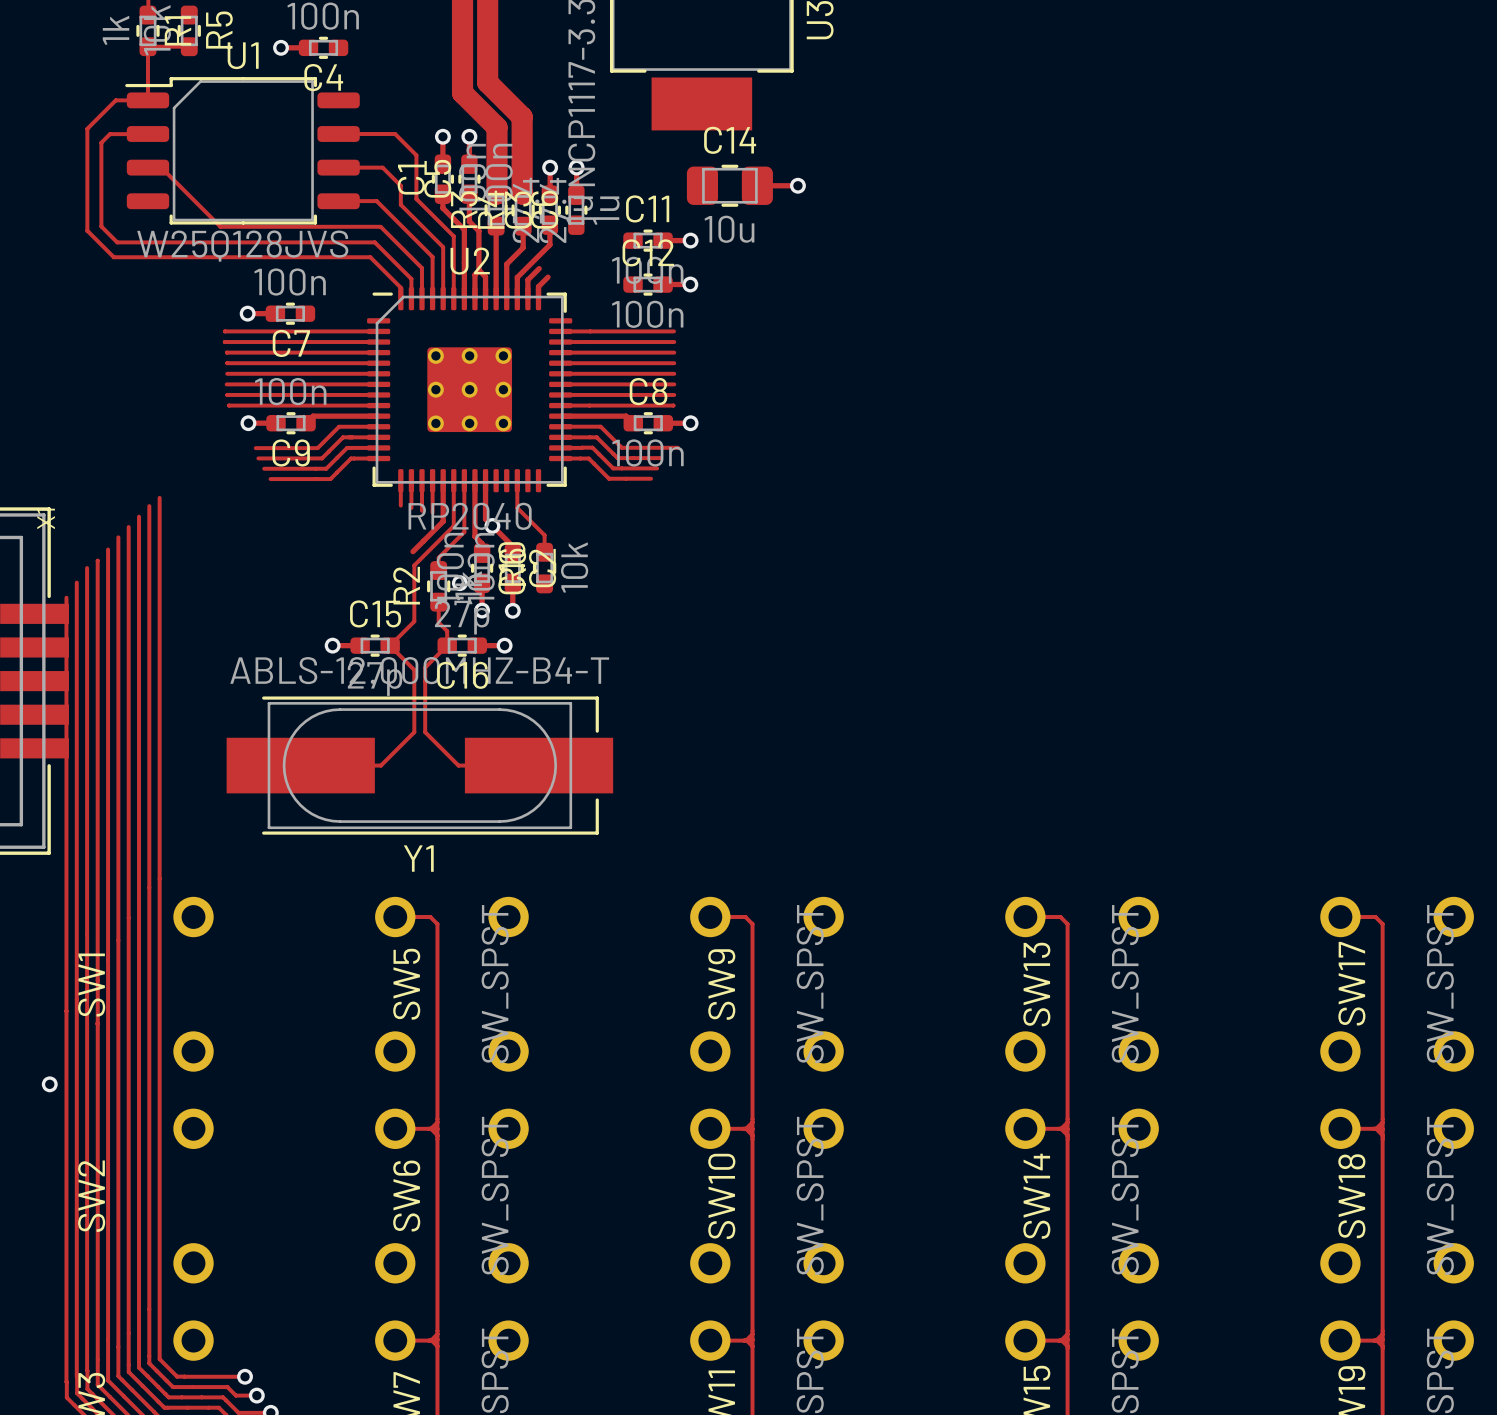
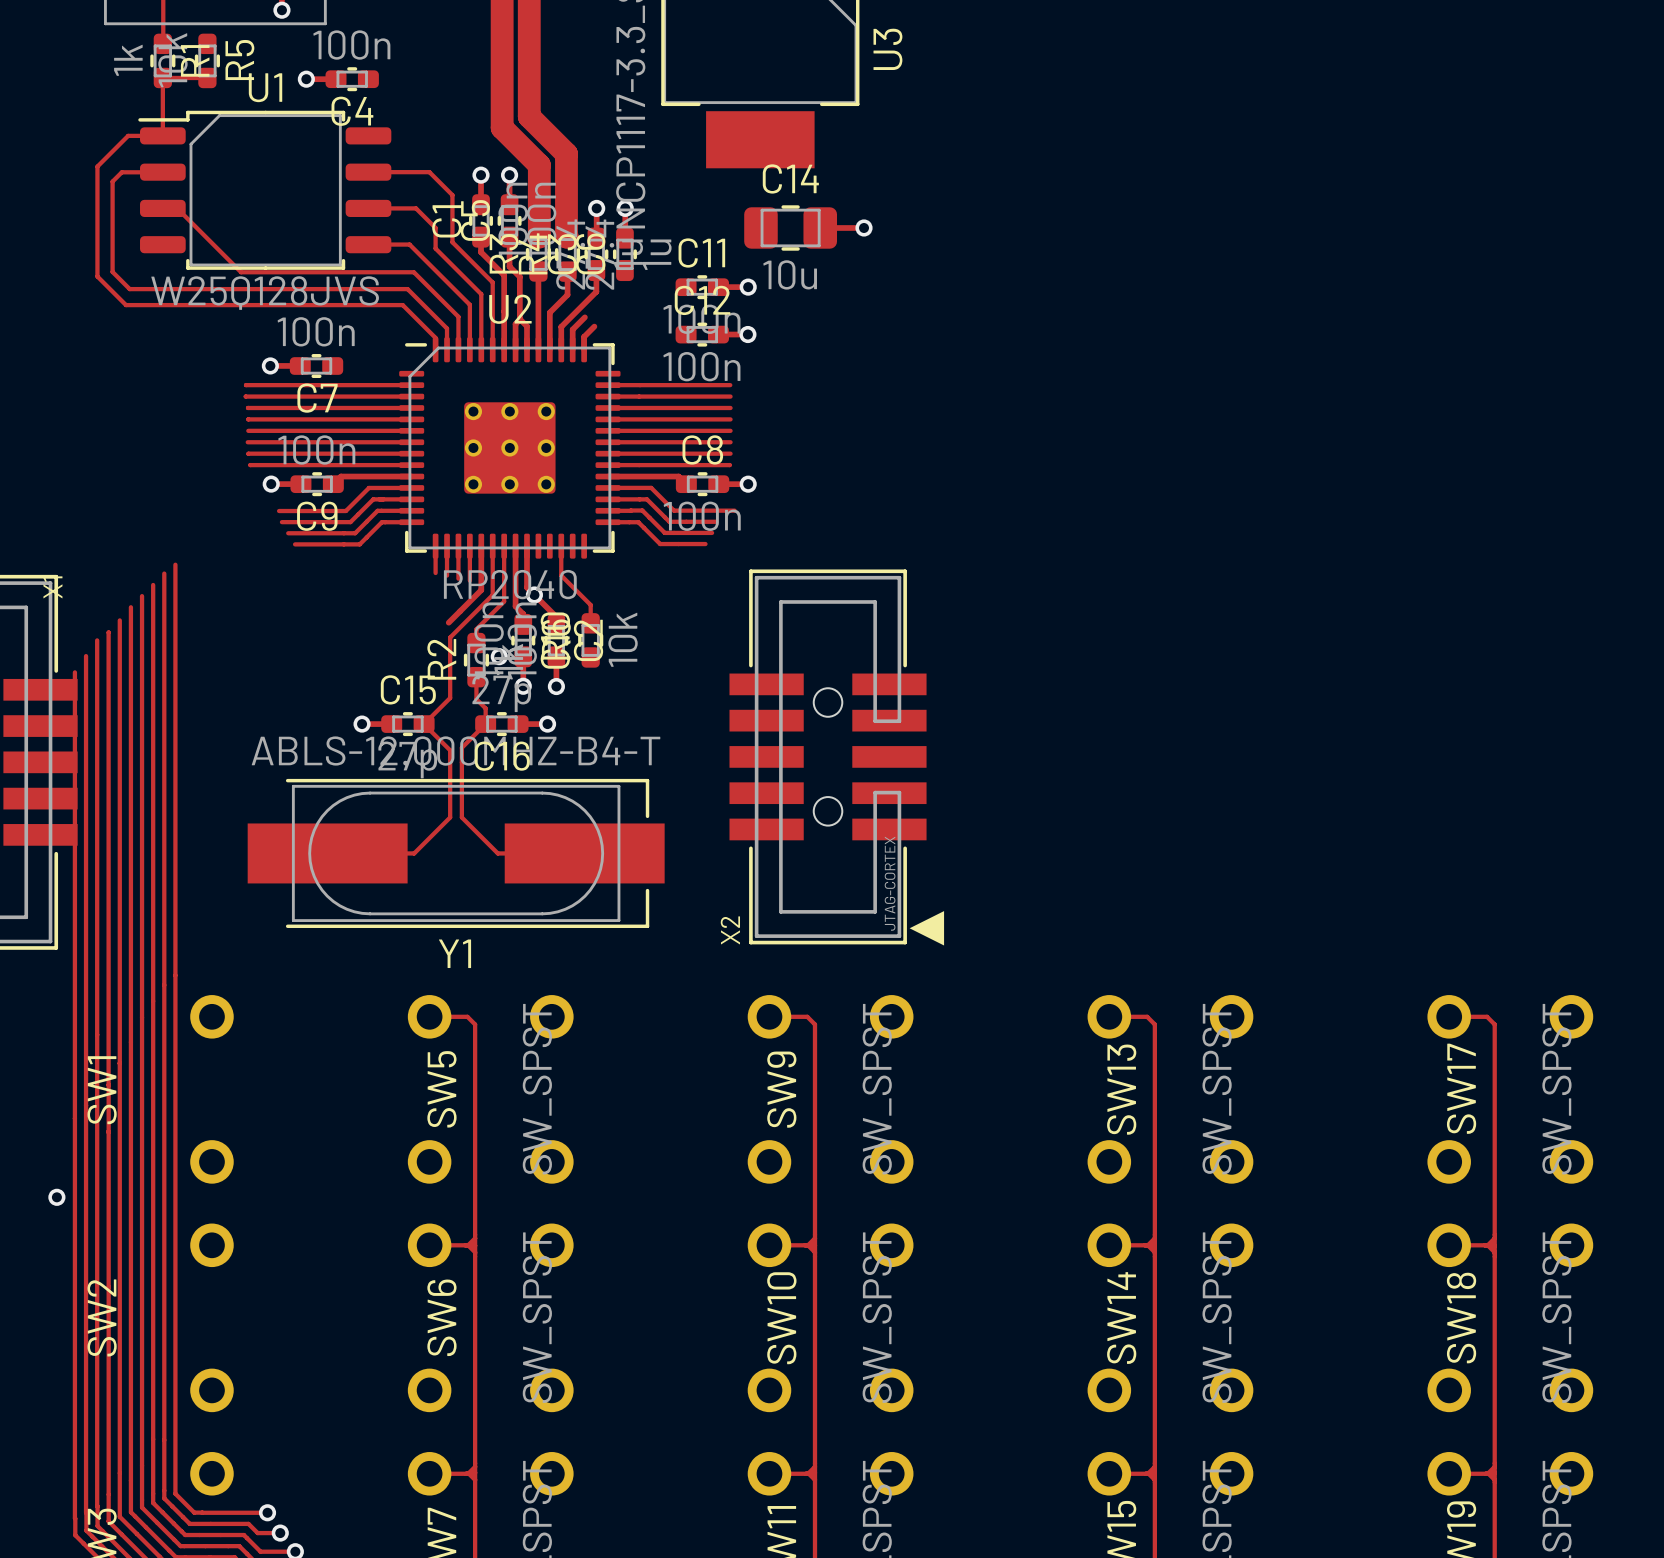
X2: none -> JTAG-CORTEX (836, 757)

